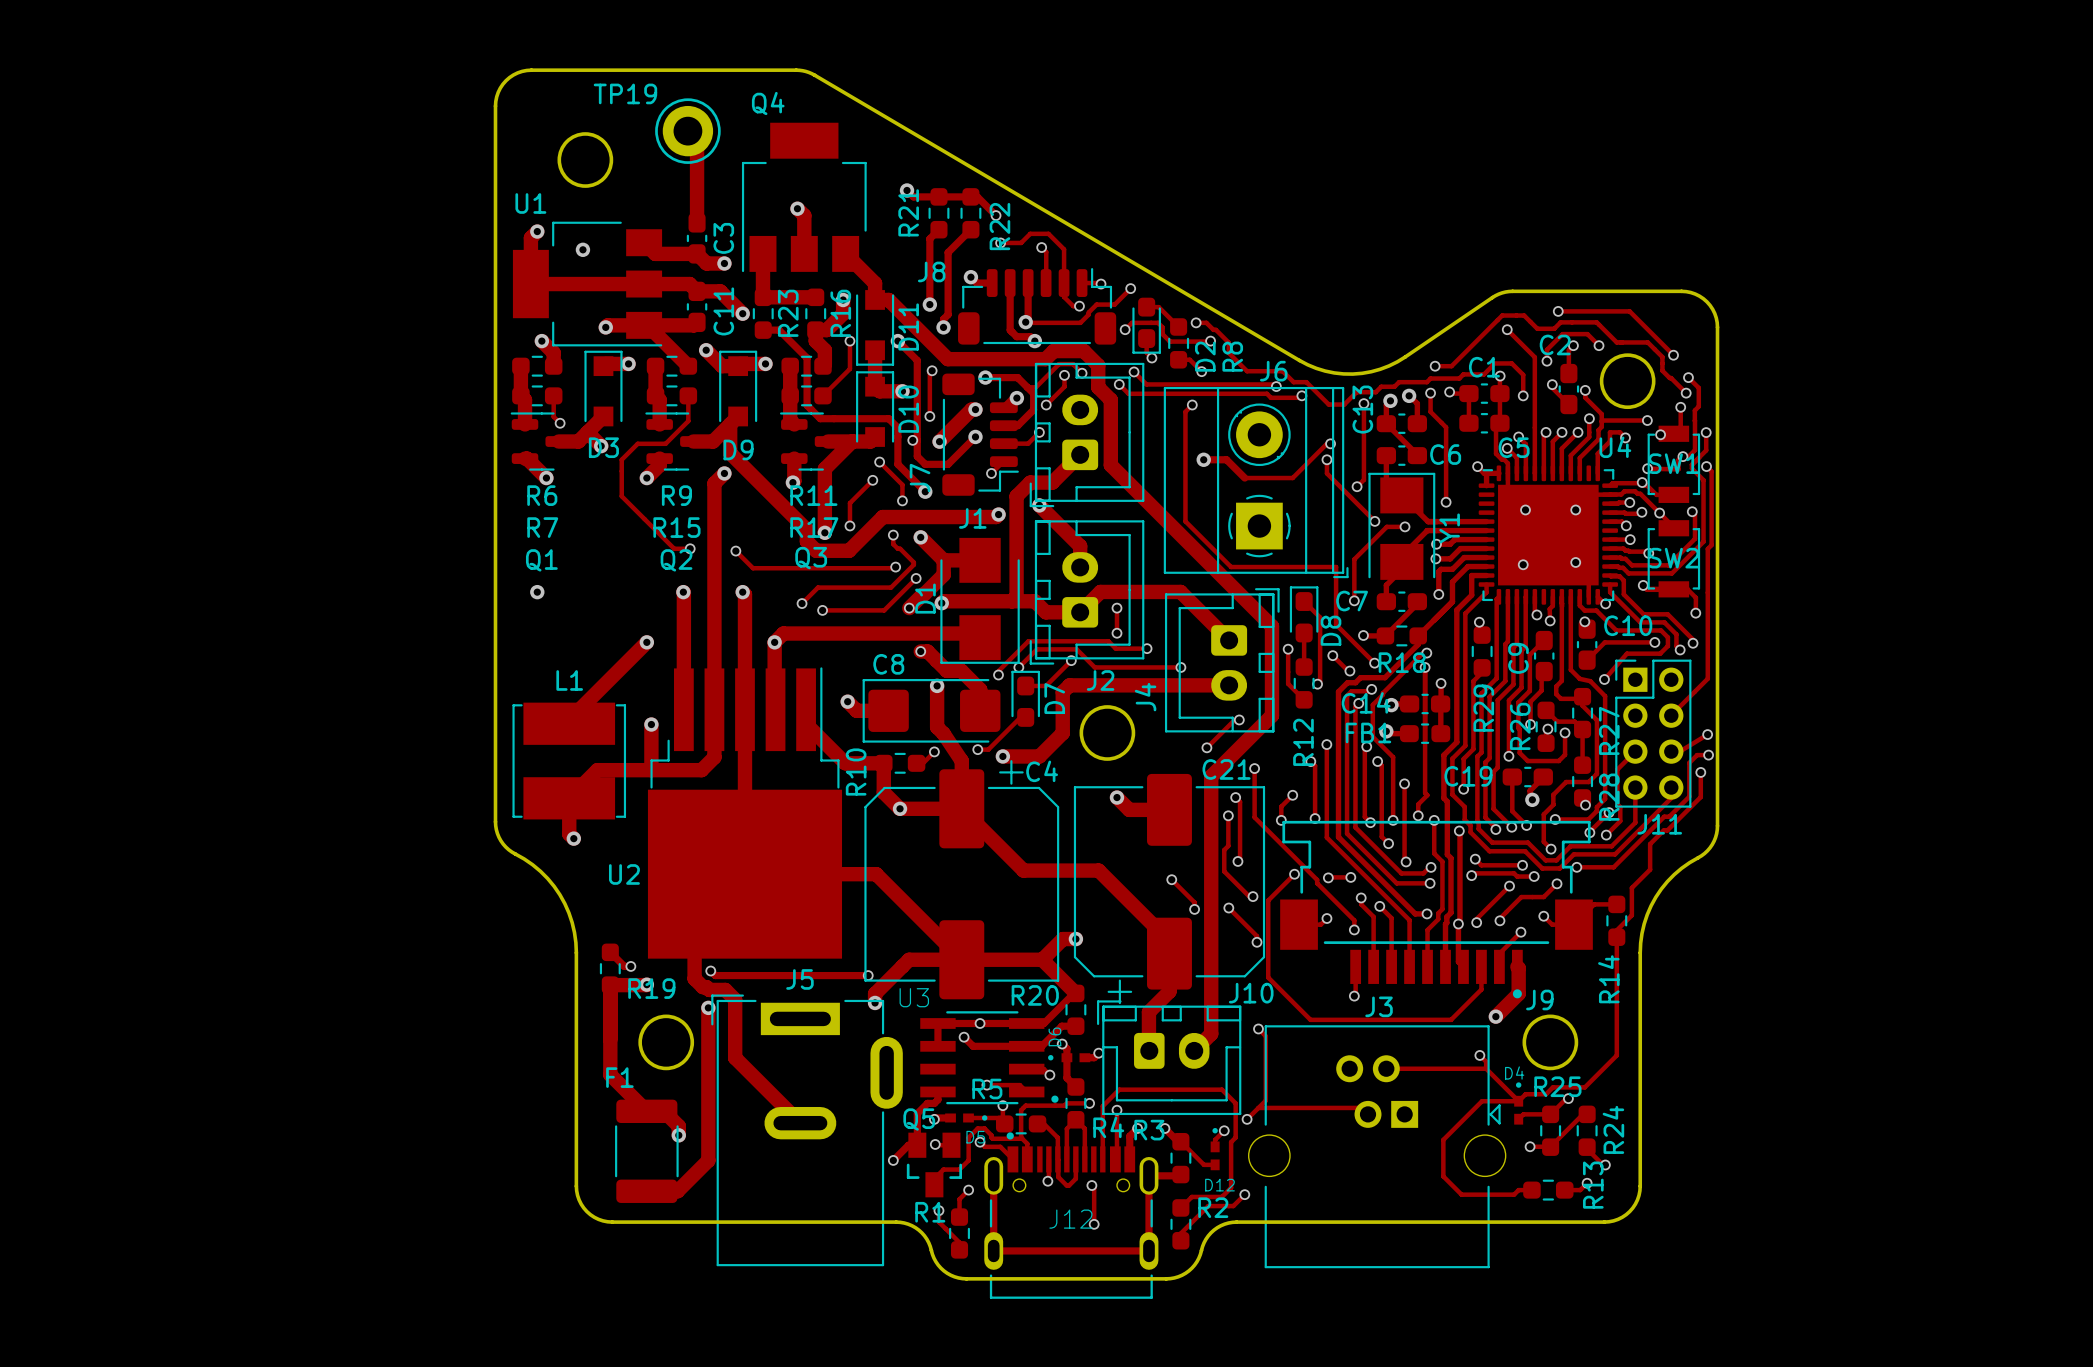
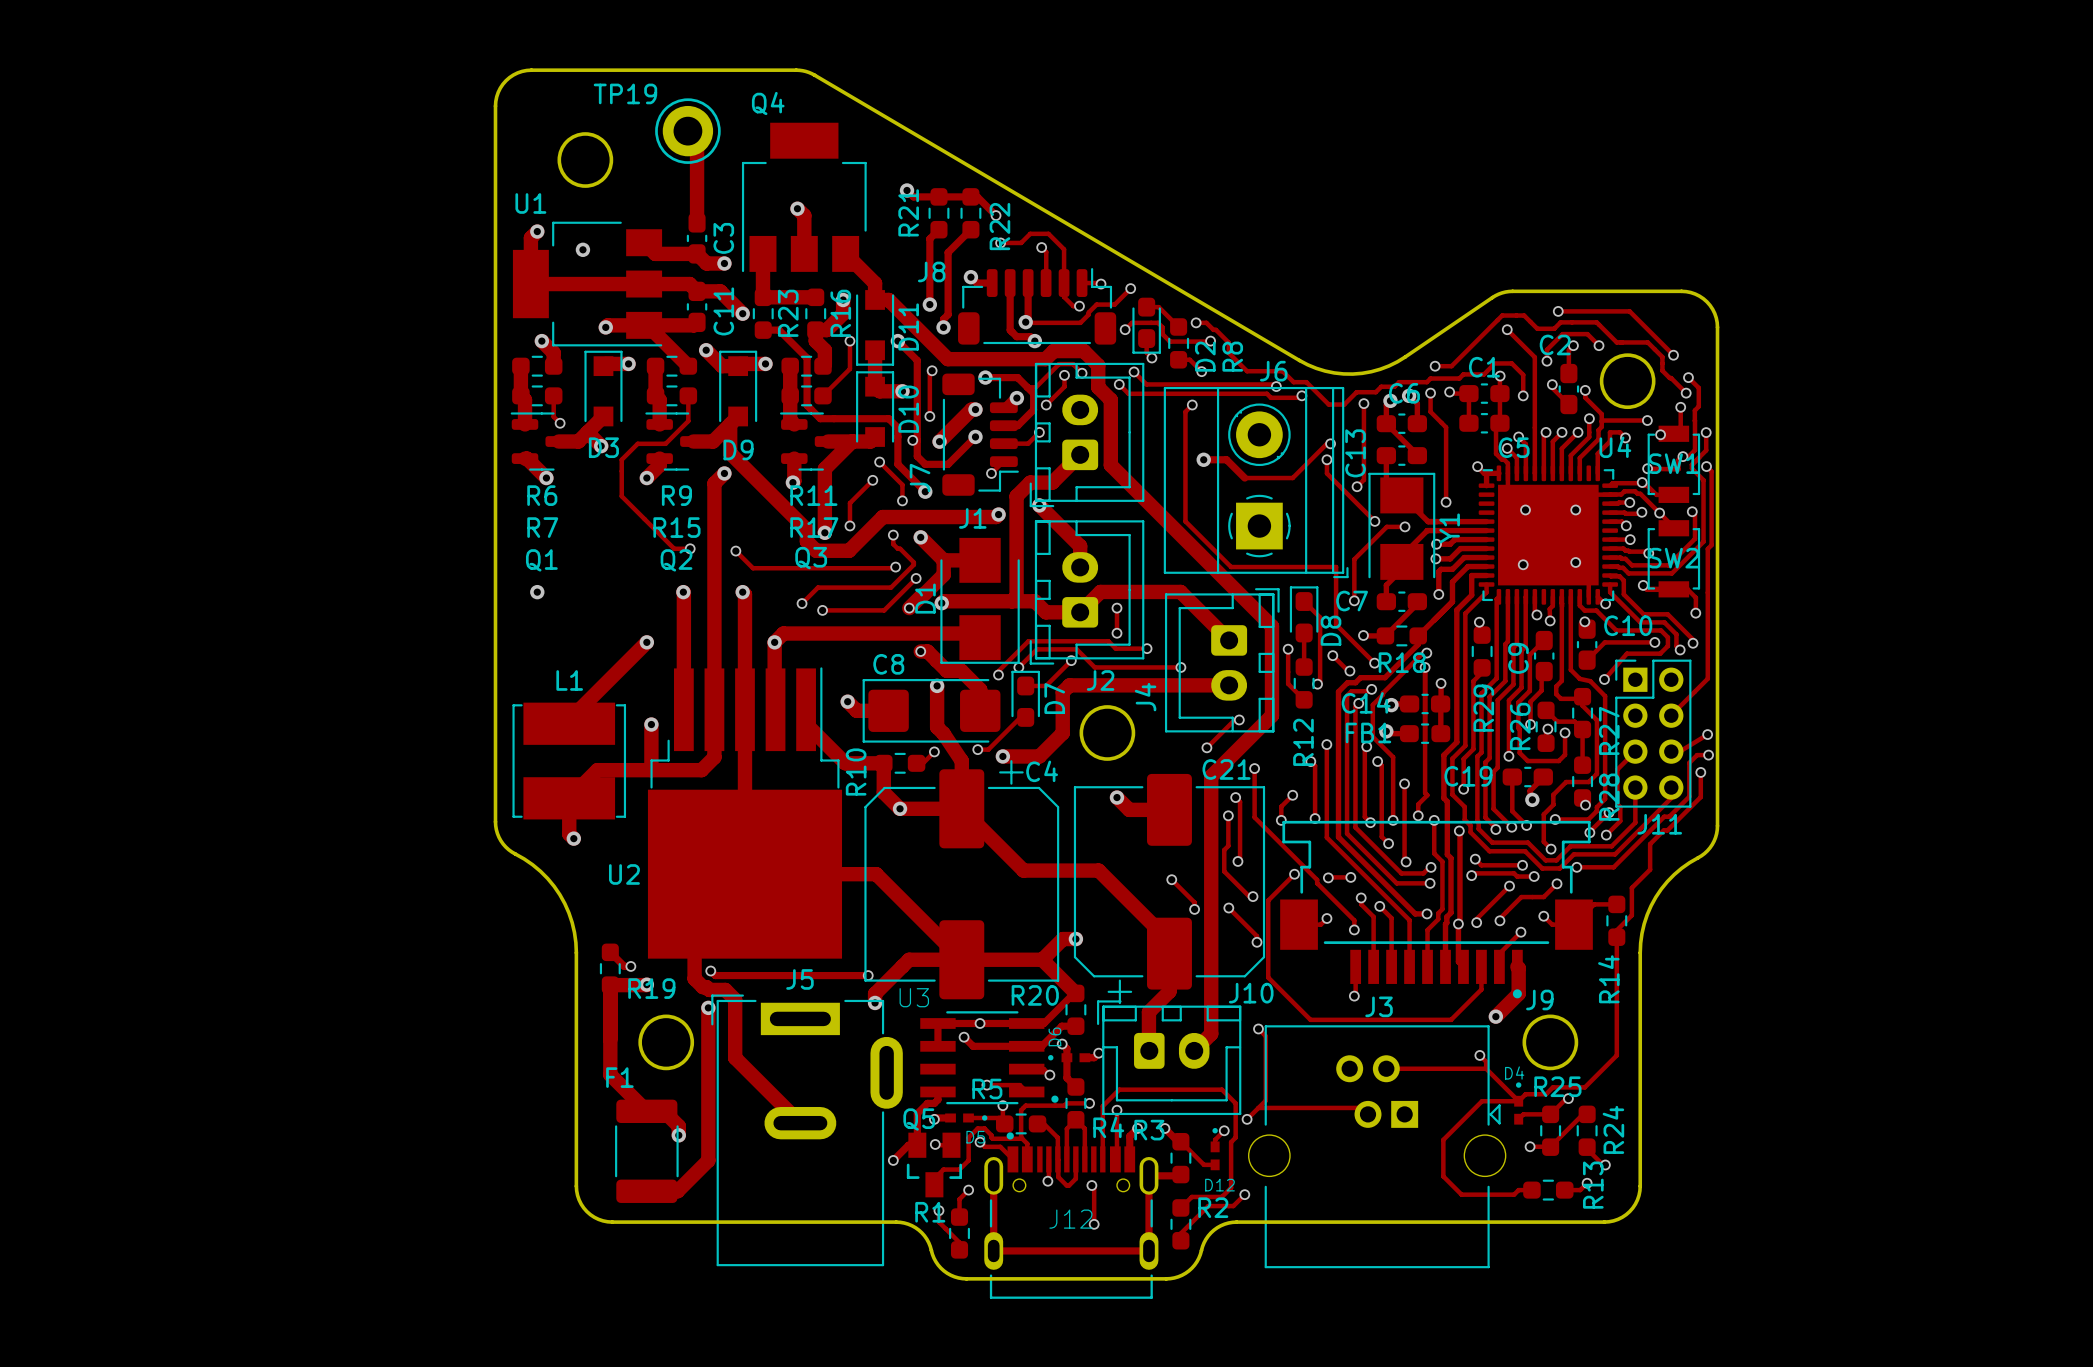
C13 name position: C13 (1362, 409) -> C13 (1355, 453)
C6 name position: C6 (1445, 454) -> C6 (1404, 393)

